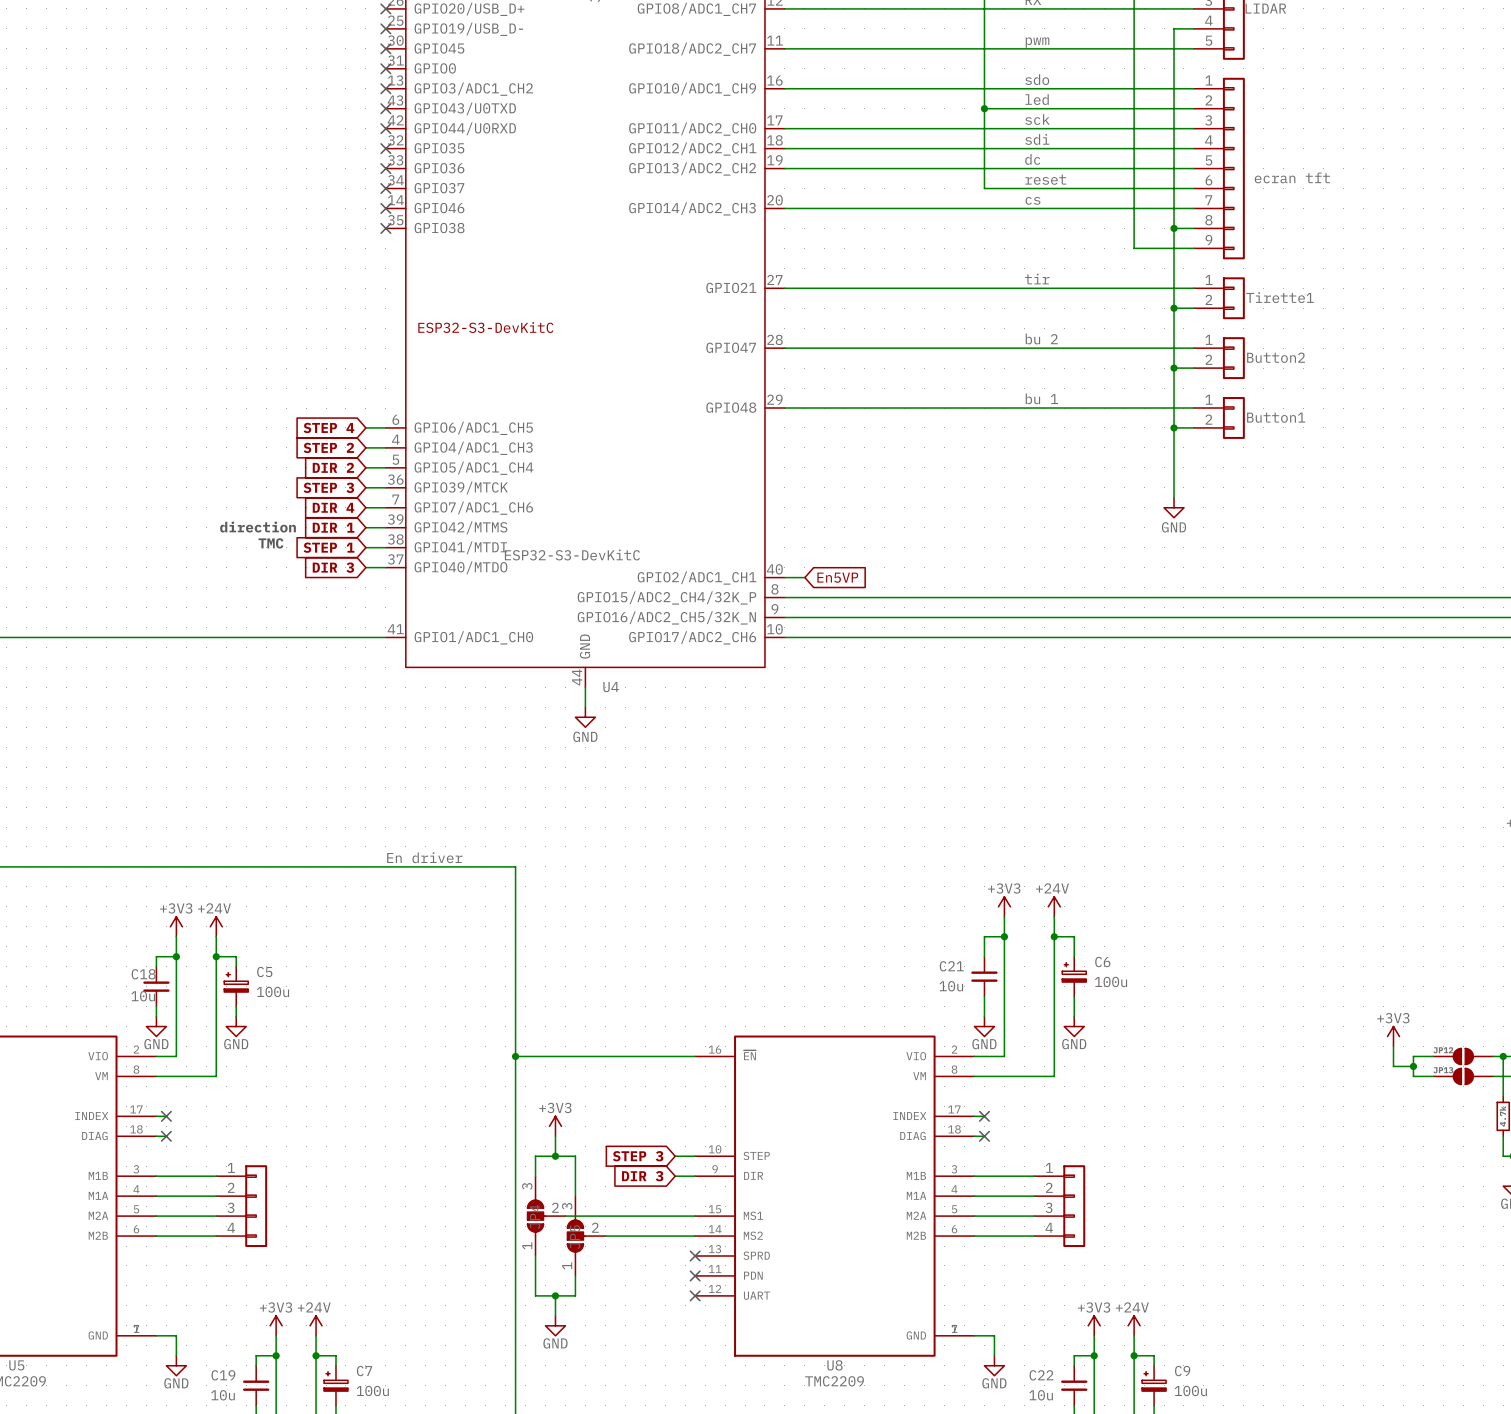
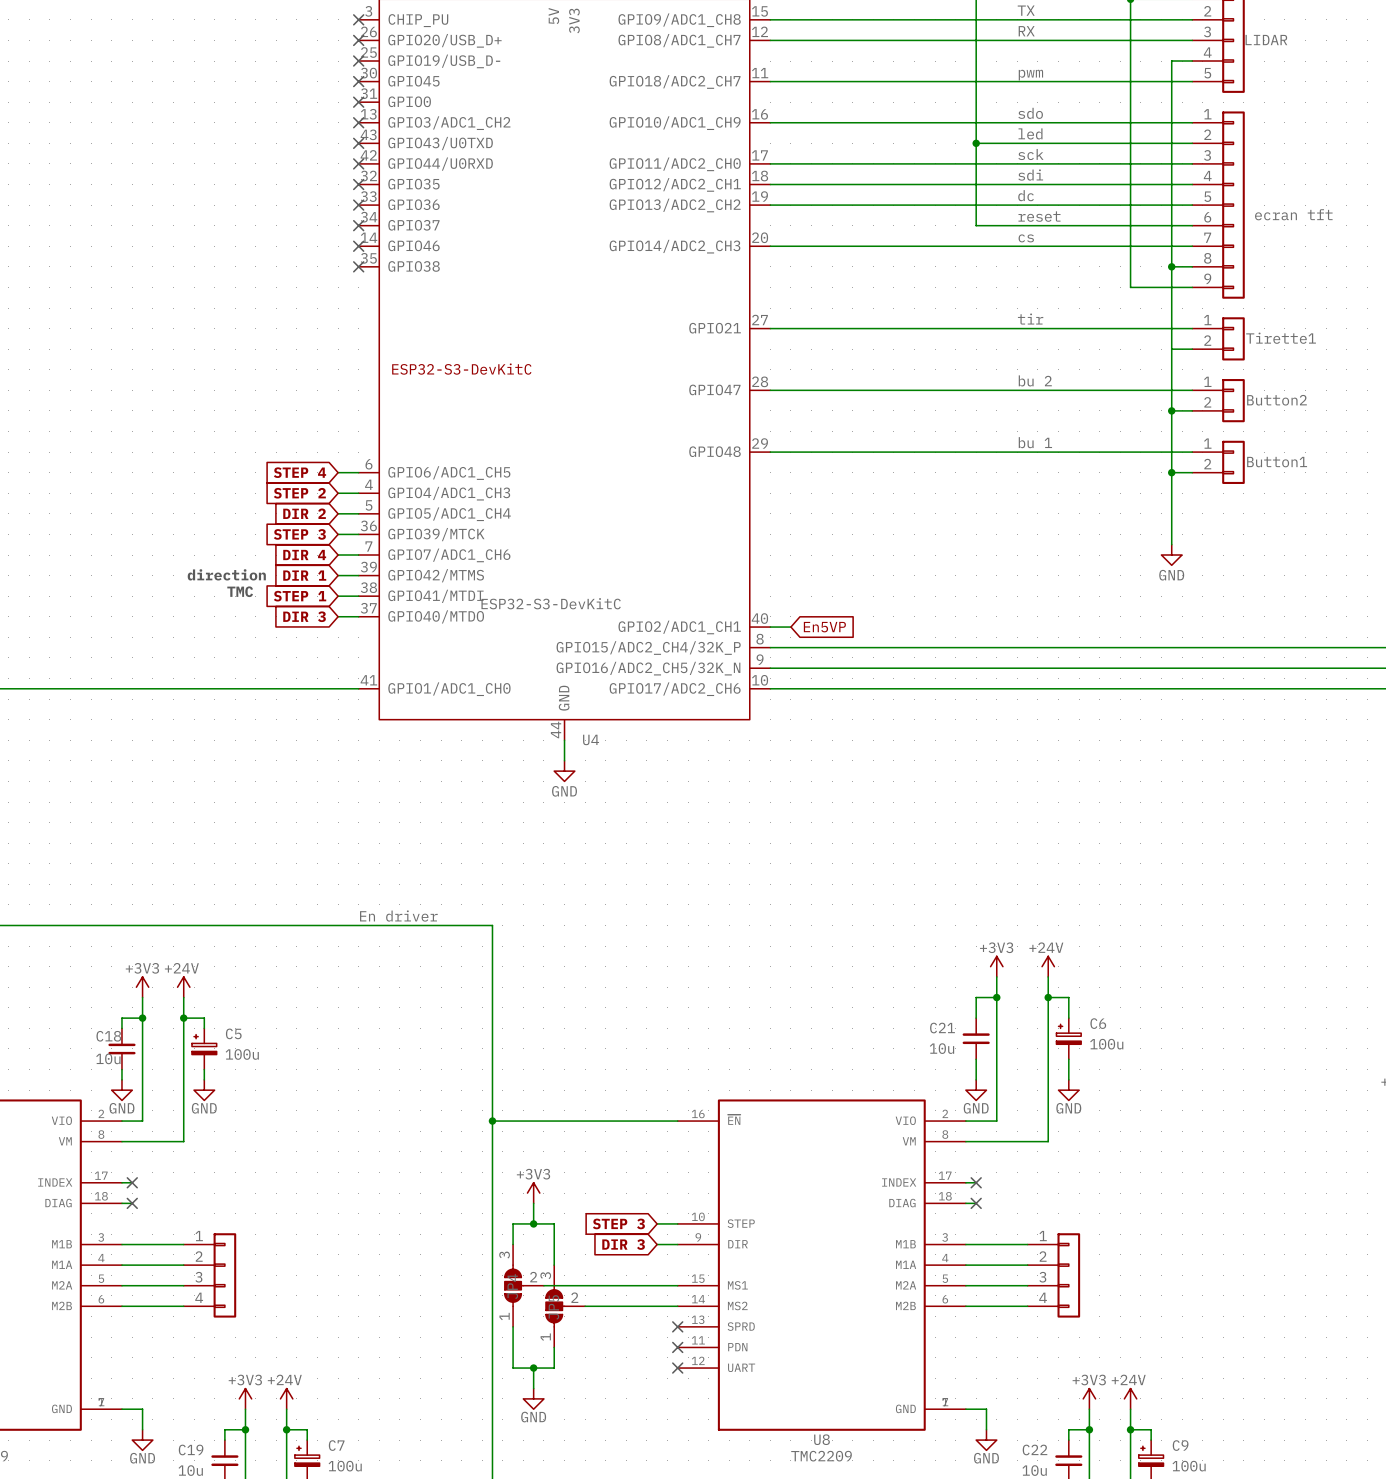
junction: (1174, 308) -> none

